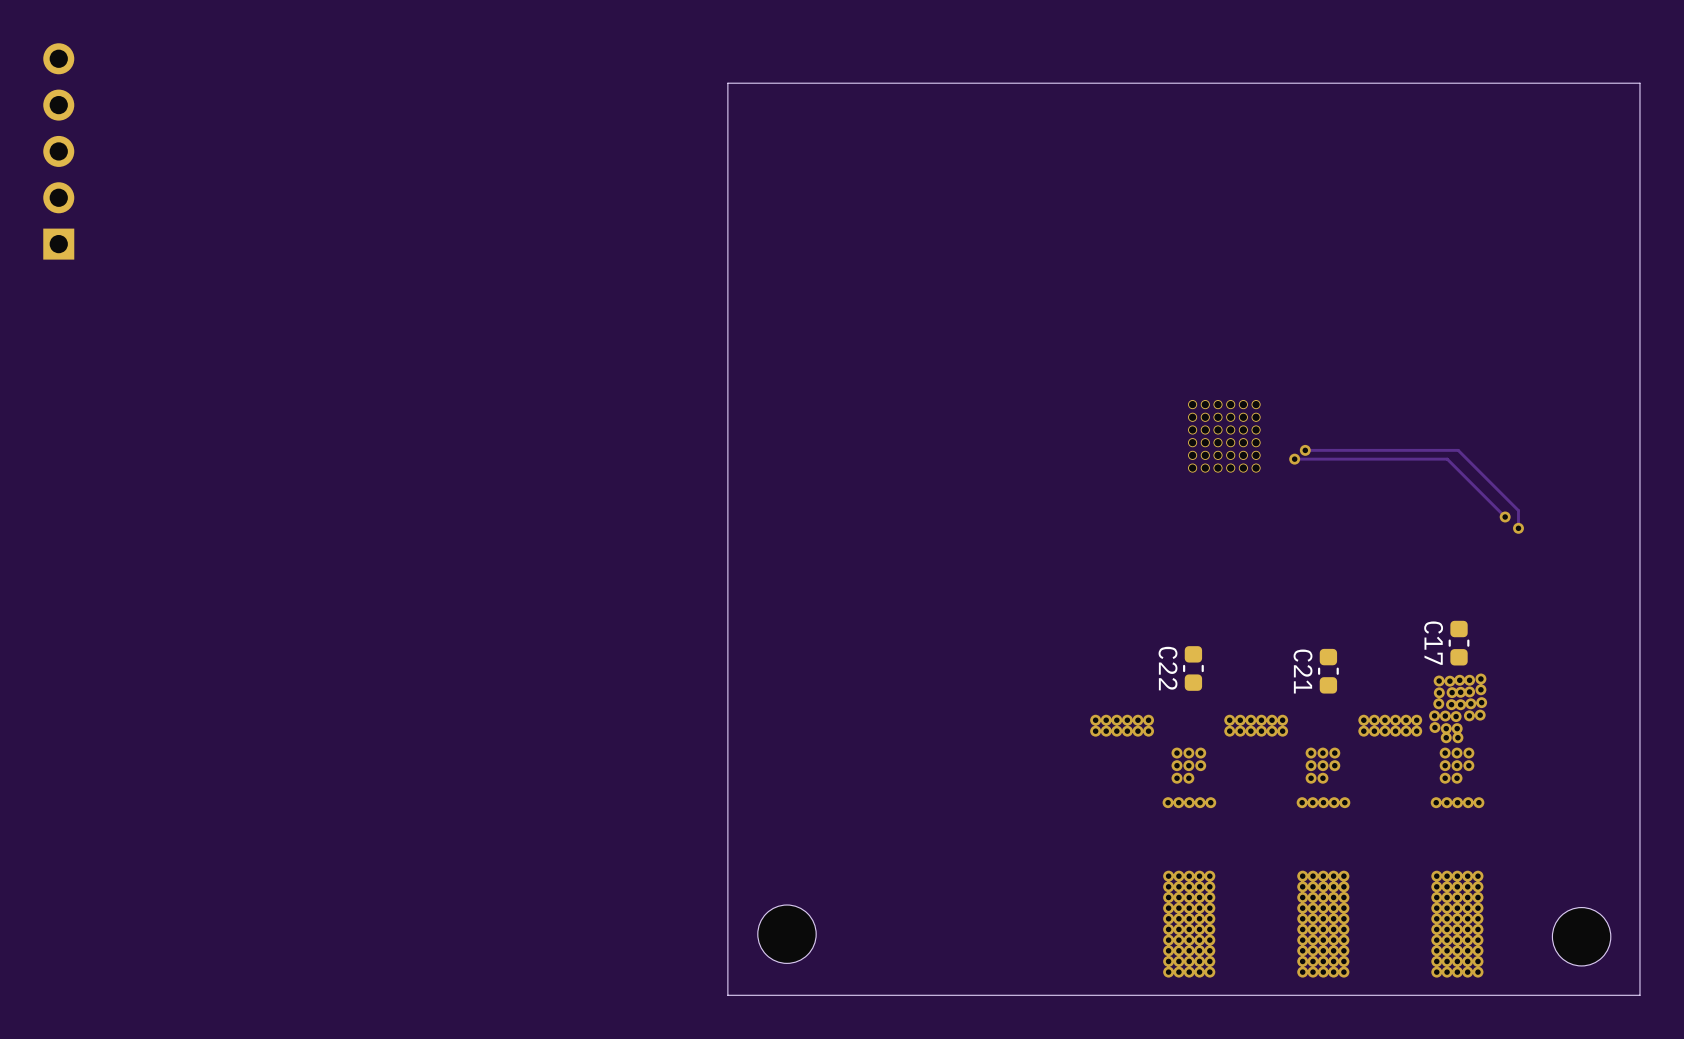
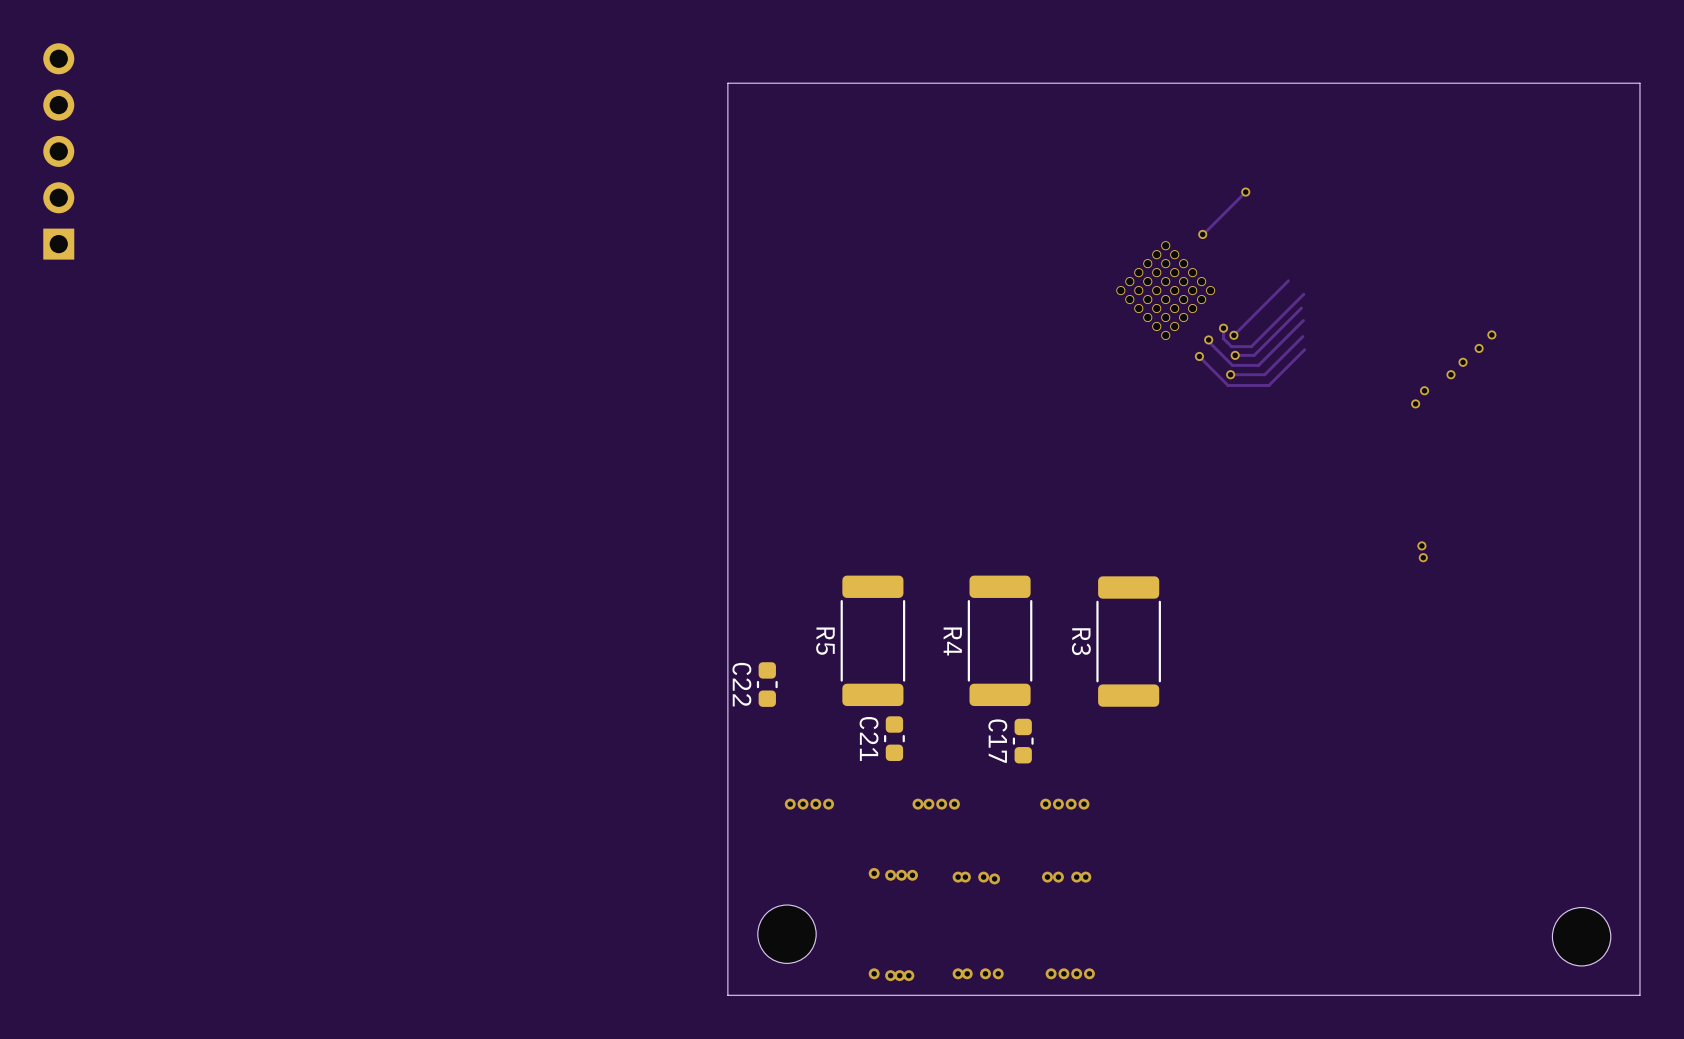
track: none -> (1245, 192) (1202, 234)
via: none -> (1245, 192)
via: none -> (1202, 234)
track: none -> (1288, 280) (1233, 335)
part: none -> (1165, 290)
track: none -> (1303, 294) (1251, 346) (1231, 346) (1223, 338) (1223, 328)
track: none -> (1301, 308) (1254, 355) (1235, 355)
track: none -> (1303, 320) (1258, 365) (1232, 365) (1208, 339)
via: none -> (1223, 328)
via: none -> (1491, 334)
via: none -> (1233, 335)
track: none -> (1302, 336) (1264, 374) (1230, 374)
via: none -> (1208, 339)
via: none -> (1479, 348)
track: none -> (1304, 349) (1268, 385) (1228, 385) (1199, 356)
via: none -> (1235, 355)
via: none -> (1199, 356)
via: none -> (1463, 362)
via: none -> (1230, 374)
via: none -> (1450, 374)
via: none -> (1424, 390)
via: none -> (1415, 403)
part: (1224, 436) -> none
track: (1305, 450) (1458, 450) (1518, 510) (1518, 528) -> none
via: (1305, 450) -> none
track: (1294, 459) (1447, 459) (1505, 517) -> none
via: (1294, 459) -> none
via: (1505, 517) -> none
via: (1518, 528) -> none
via: none -> (1421, 545)
via: none -> (1423, 557)
R5: none -> (872, 640)
R4: none -> (1000, 640)
R3: none -> (1128, 641)
C17 position: (1459, 643) -> (1023, 741)
C22 position: (1193, 668) -> (767, 684)
C21 position: (1328, 671) -> (894, 738)
via: (1480, 678) -> none
via: (1459, 680) -> none
via: (1469, 680) -> none
via: (1439, 681) -> none
via: (1449, 681) -> none
via: (1480, 689) -> none
via: (1469, 691) -> none
via: (1439, 692) -> none
via: (1452, 692) -> none
via: (1460, 692) -> none
via: (1481, 702) -> none
via: (1438, 703) -> none
via: (1470, 703) -> none
via: (1451, 704) -> none
via: (1460, 704) -> none
via: (1434, 715) -> none
via: (1469, 715) -> none
via: (1480, 715) -> none
via: (1445, 716) -> none
via: (1456, 716) -> none
via: (1095, 720) -> none
via: (1106, 720) -> none
via: (1116, 720) -> none
via: (1127, 720) -> none
via: (1137, 720) -> none
via: (1148, 720) -> none
via: (1229, 720) -> none
via: (1240, 720) -> none
via: (1250, 720) -> none
via: (1261, 720) -> none
via: (1272, 720) -> none
via: (1282, 720) -> none
via: (1363, 720) -> none
via: (1374, 720) -> none
via: (1384, 720) -> none
via: (1395, 720) -> none
via: (1406, 720) -> none
via: (1416, 720) -> none
via: (1434, 727) -> none
via: (1446, 728) -> none
via: (1457, 728) -> none
via: (1095, 731) -> none
via: (1106, 731) -> none
via: (1116, 731) -> none
via: (1127, 731) -> none
via: (1137, 731) -> none
via: (1148, 731) -> none
via: (1229, 731) -> none
via: (1240, 731) -> none
via: (1250, 731) -> none
via: (1261, 731) -> none
via: (1272, 731) -> none
via: (1282, 731) -> none
via: (1363, 731) -> none
via: (1374, 731) -> none
via: (1384, 731) -> none
via: (1395, 731) -> none
via: (1406, 731) -> none
via: (1416, 731) -> none
via: (1446, 737) -> none
via: (1457, 737) -> none
via: (1177, 753) -> none
via: (1188, 753) -> none
via: (1200, 753) -> none
via: (1311, 753) -> none
via: (1322, 753) -> none
via: (1334, 753) -> none
via: (1445, 753) -> none
via: (1457, 753) -> none
via: (1468, 753) -> none
via: (1177, 765) -> none
via: (1188, 765) -> none
via: (1200, 765) -> none
via: (1311, 765) -> none
via: (1322, 765) -> none
via: (1334, 765) -> none
via: (1445, 765) -> none
via: (1457, 765) -> none
via: (1468, 765) -> none
via: (1177, 778) -> none
via: (1188, 778) -> none
via: (1311, 778) -> none
via: (1322, 778) -> none
via: (1445, 778) -> none
via: (1457, 778) -> none
via: (1168, 802) -> none
via: (1178, 802) -> none
via: (1189, 802) -> none
via: (1200, 802) -> none
via: (1210, 802) -> none
via: (1302, 802) -> none
via: (1312, 802) -> none
via: (1323, 802) -> none
via: (1334, 802) -> none
via: (1344, 802) -> none
via: (1436, 802) -> none
via: (1446, 802) -> none
via: (1457, 802) -> none
via: (1468, 802) -> none
via: (1478, 802) -> none
via: none -> (790, 804)
via: none -> (803, 804)
via: none -> (815, 804)
via: none -> (828, 804)
via: none -> (917, 804)
via: none -> (928, 804)
via: none -> (941, 804)
via: none -> (954, 804)
via: none -> (1045, 804)
via: none -> (1058, 804)
via: none -> (1071, 804)
via: none -> (1083, 804)
via: none -> (874, 873)
via: none -> (890, 875)
via: none -> (901, 875)
via: none -> (912, 875)
via: (1168, 876) -> none
via: (1178, 876) -> none
via: (1189, 876) -> none
via: (1199, 876) -> none
via: (1209, 876) -> none
via: (1302, 876) -> none
via: (1312, 876) -> none
via: (1323, 876) -> none
via: (1333, 876) -> none
via: (1343, 876) -> none
via: (1436, 876) -> none
via: (1447, 876) -> none
via: (1457, 876) -> none
via: (1467, 876) -> none
via: (1477, 876) -> none
via: none -> (958, 877)
via: none -> (965, 877)
via: none -> (983, 877)
via: none -> (1047, 877)
via: none -> (1058, 877)
via: none -> (1076, 877)
via: none -> (1085, 877)
via: none -> (994, 878)
via: (1168, 886) -> none
via: (1178, 886) -> none
via: (1189, 886) -> none
via: (1199, 886) -> none
via: (1209, 886) -> none
via: (1302, 886) -> none
via: (1312, 886) -> none
via: (1323, 886) -> none
via: (1333, 886) -> none
via: (1343, 886) -> none
via: (1436, 886) -> none
via: (1447, 886) -> none
via: (1457, 886) -> none
via: (1467, 886) -> none
via: (1477, 886) -> none
via: (1168, 897) -> none
via: (1178, 897) -> none
via: (1189, 897) -> none
via: (1199, 897) -> none
via: (1209, 897) -> none
via: (1302, 897) -> none
via: (1312, 897) -> none
via: (1323, 897) -> none
via: (1333, 897) -> none
via: (1343, 897) -> none
via: (1436, 897) -> none
via: (1447, 897) -> none
via: (1457, 897) -> none
via: (1467, 897) -> none
via: (1477, 897) -> none
via: (1168, 908) -> none
via: (1178, 908) -> none
via: (1189, 908) -> none
via: (1199, 908) -> none
via: (1209, 908) -> none
via: (1302, 908) -> none
via: (1312, 908) -> none
via: (1323, 908) -> none
via: (1333, 908) -> none
via: (1343, 908) -> none
via: (1436, 908) -> none
via: (1447, 908) -> none
via: (1457, 908) -> none
via: (1467, 908) -> none
via: (1477, 908) -> none
via: (1168, 918) -> none
via: (1178, 918) -> none
via: (1189, 918) -> none
via: (1199, 918) -> none
via: (1209, 918) -> none
via: (1302, 918) -> none
via: (1312, 918) -> none
via: (1323, 918) -> none
via: (1333, 918) -> none
via: (1343, 918) -> none
via: (1436, 918) -> none
via: (1447, 918) -> none
via: (1457, 918) -> none
via: (1467, 918) -> none
via: (1477, 918) -> none
via: (1168, 929) -> none
via: (1178, 929) -> none
via: (1189, 929) -> none
via: (1199, 929) -> none
via: (1209, 929) -> none
via: (1302, 929) -> none
via: (1312, 929) -> none
via: (1323, 929) -> none
via: (1333, 929) -> none
via: (1343, 929) -> none
via: (1436, 929) -> none
via: (1447, 929) -> none
via: (1457, 929) -> none
via: (1467, 929) -> none
via: (1477, 929) -> none
via: (1168, 940) -> none
via: (1178, 940) -> none
via: (1189, 940) -> none
via: (1199, 940) -> none
via: (1209, 940) -> none
via: (1302, 940) -> none
via: (1312, 940) -> none
via: (1323, 940) -> none
via: (1333, 940) -> none
via: (1343, 940) -> none
via: (1436, 940) -> none
via: (1447, 940) -> none
via: (1457, 940) -> none
via: (1467, 940) -> none
via: (1477, 940) -> none
via: (1168, 950) -> none
via: (1178, 950) -> none
via: (1189, 950) -> none
via: (1199, 950) -> none
via: (1209, 950) -> none
via: (1302, 950) -> none
via: (1312, 950) -> none
via: (1323, 950) -> none
via: (1333, 950) -> none
via: (1343, 950) -> none
via: (1436, 950) -> none
via: (1447, 950) -> none
via: (1457, 950) -> none
via: (1467, 950) -> none
via: (1477, 950) -> none
via: (1168, 961) -> none
via: (1178, 961) -> none
via: (1189, 961) -> none
via: (1199, 961) -> none
via: (1209, 961) -> none
via: (1302, 961) -> none
via: (1312, 961) -> none
via: (1323, 961) -> none
via: (1333, 961) -> none
via: (1343, 961) -> none
via: (1436, 961) -> none
via: (1447, 961) -> none
via: (1457, 961) -> none
via: (1467, 961) -> none
via: (1477, 961) -> none
via: (1168, 972) -> none
via: (1178, 972) -> none
via: (1189, 972) -> none
via: (1199, 972) -> none
via: (1209, 972) -> none
via: (1302, 972) -> none
via: (1312, 972) -> none
via: (1323, 972) -> none
via: (1333, 972) -> none
via: (1343, 972) -> none
via: (1436, 972) -> none
via: (1447, 972) -> none
via: (1457, 972) -> none
via: (1467, 972) -> none
via: (1477, 972) -> none
via: none -> (874, 973)
via: none -> (958, 973)
via: none -> (967, 973)
via: none -> (985, 973)
via: none -> (998, 973)
via: none -> (1051, 973)
via: none -> (1063, 973)
via: none -> (1076, 973)
via: none -> (1089, 973)
via: none -> (890, 975)
via: none -> (899, 975)
via: none -> (908, 975)

